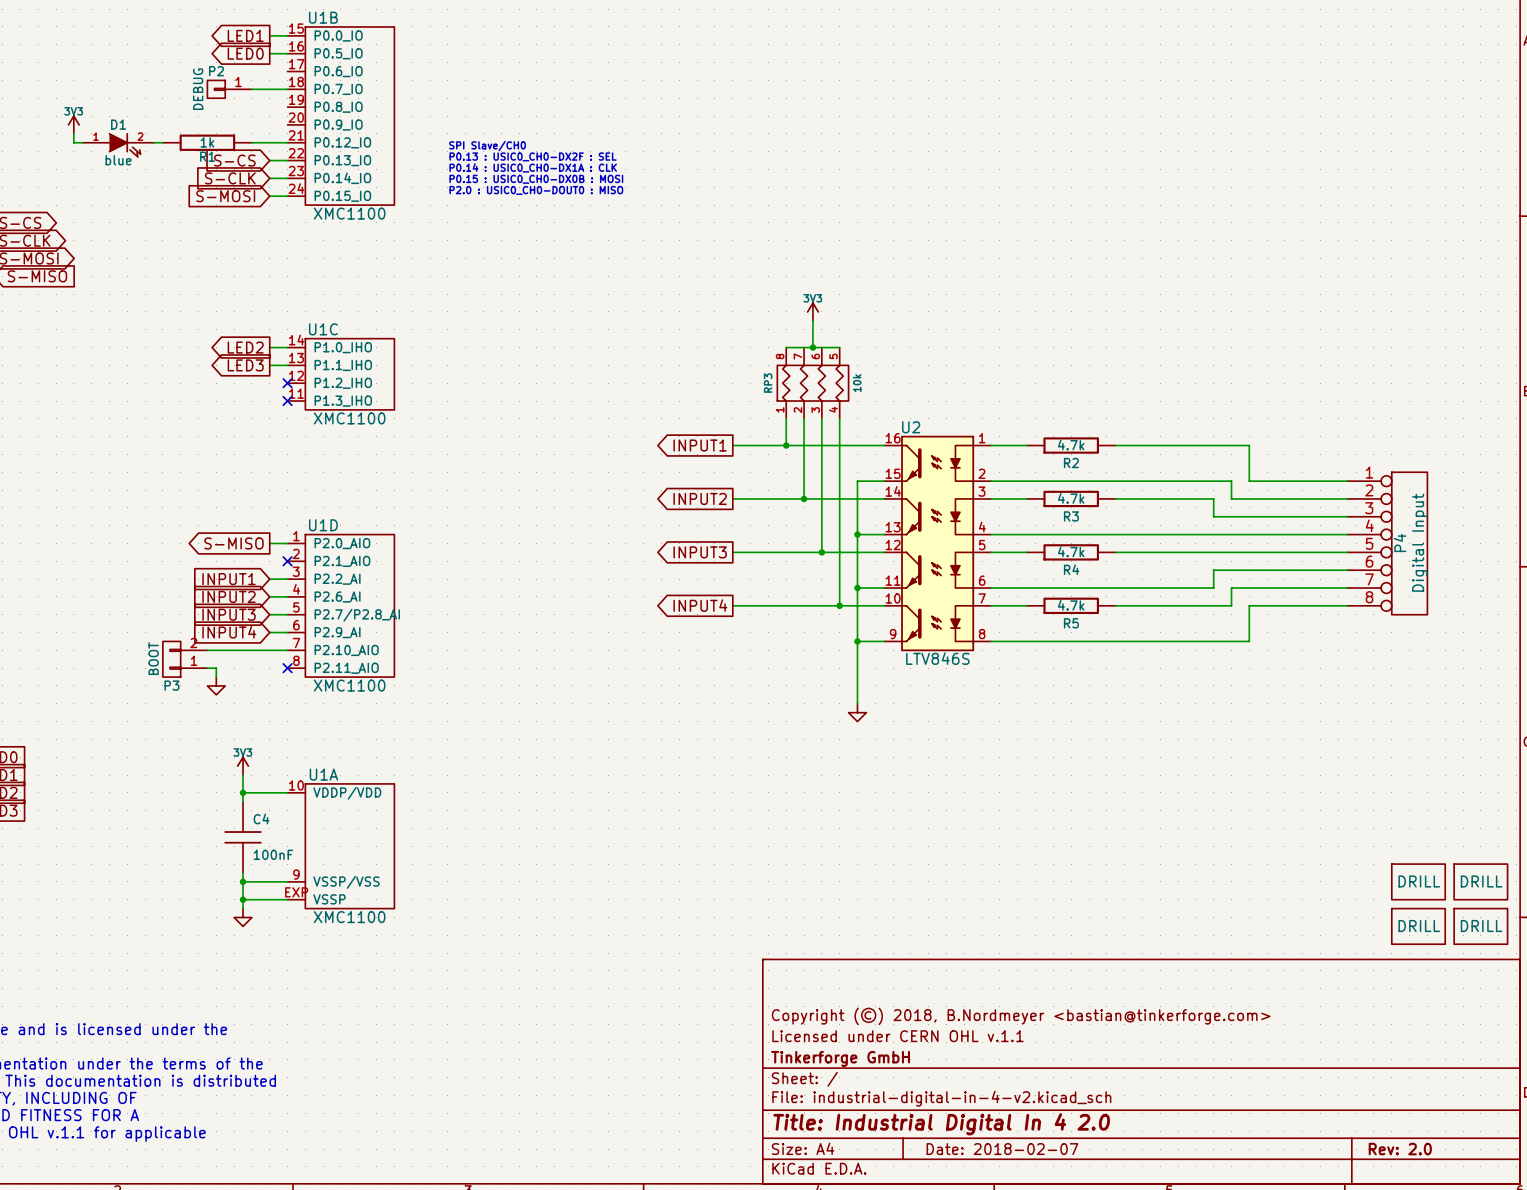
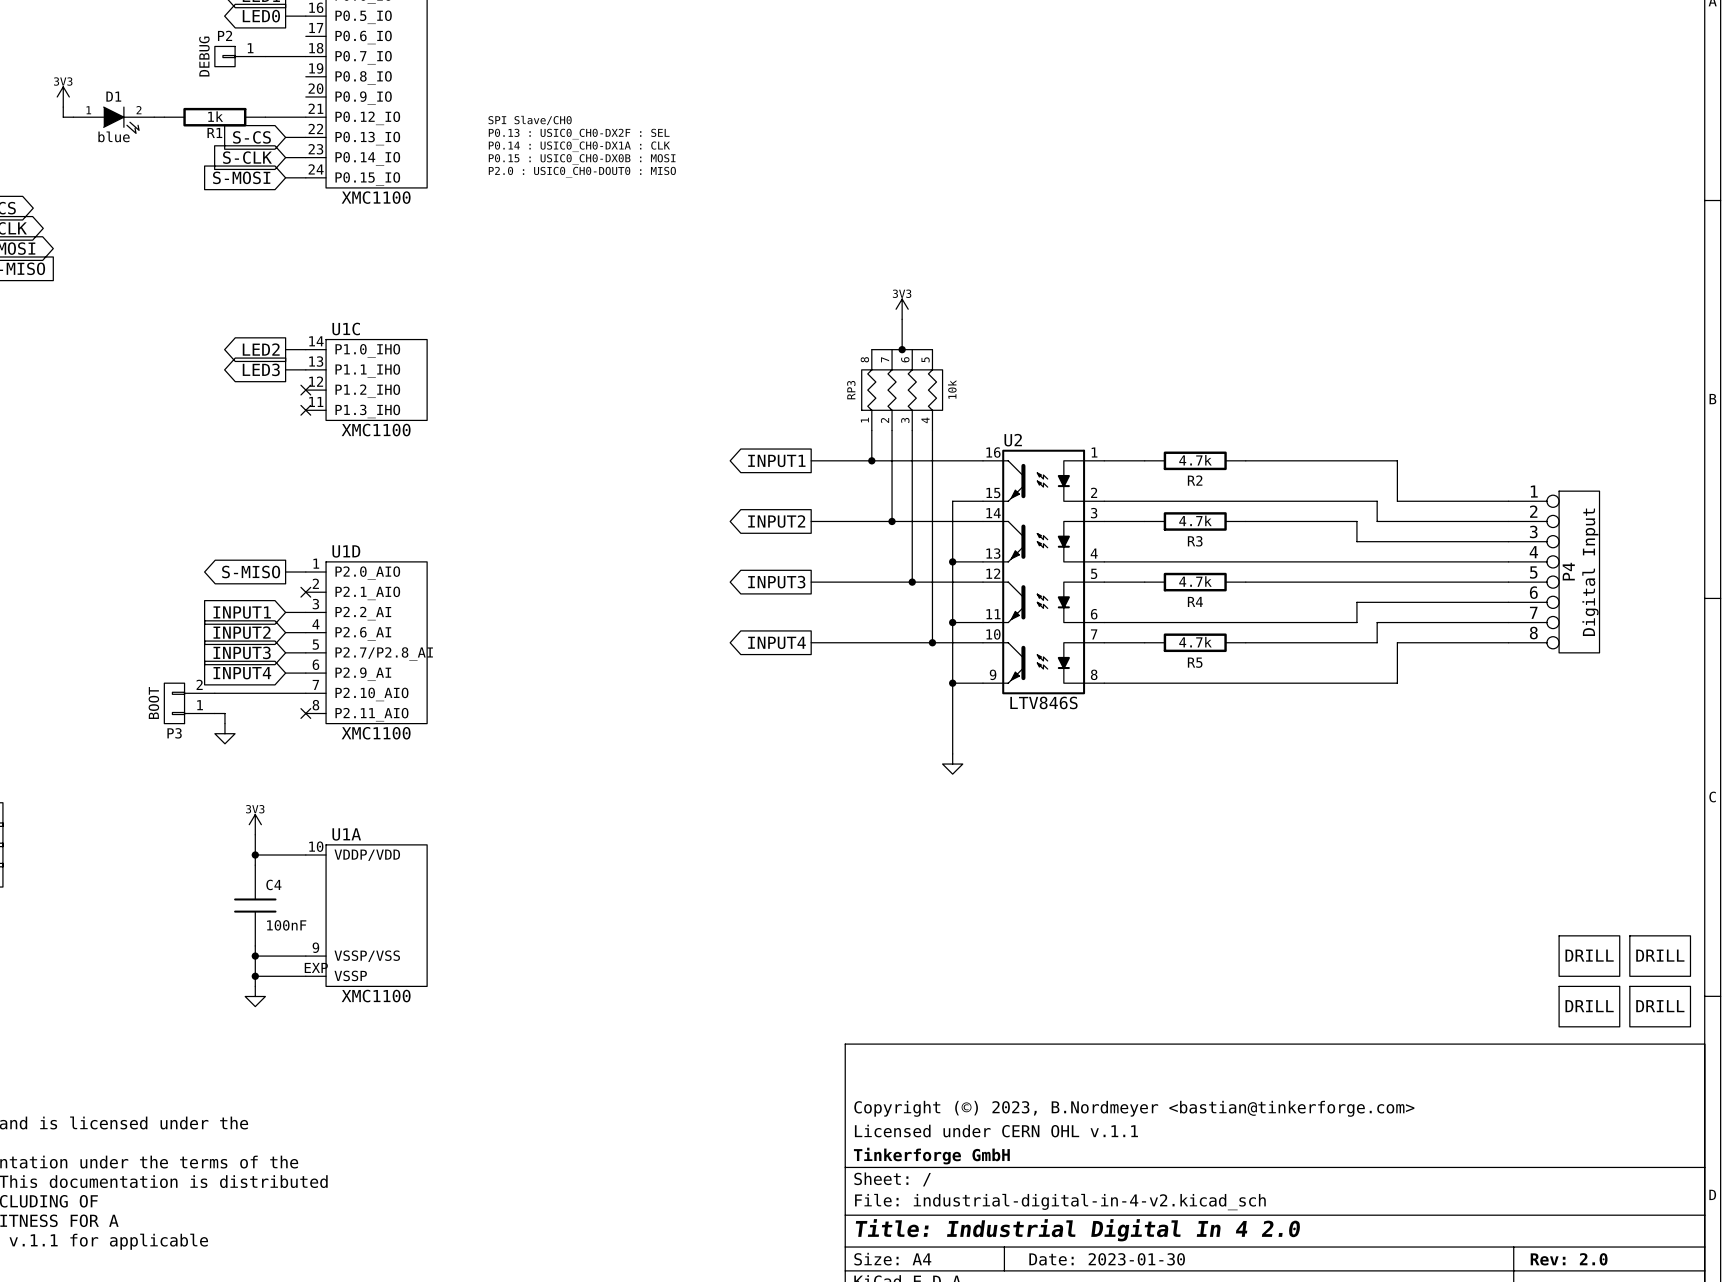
title block: Copyright (©) 2018, B.Nordmeyer <bastian@tinkerforge.com> (1021, 1016) -> Copyright (©) 2023, B.Nordmeyer <bastian@tinkerforge.com> (1134, 1108)
title block: Date: 2018-02-07 (1002, 1149) -> Date: 2023-01-30 (1107, 1259)

